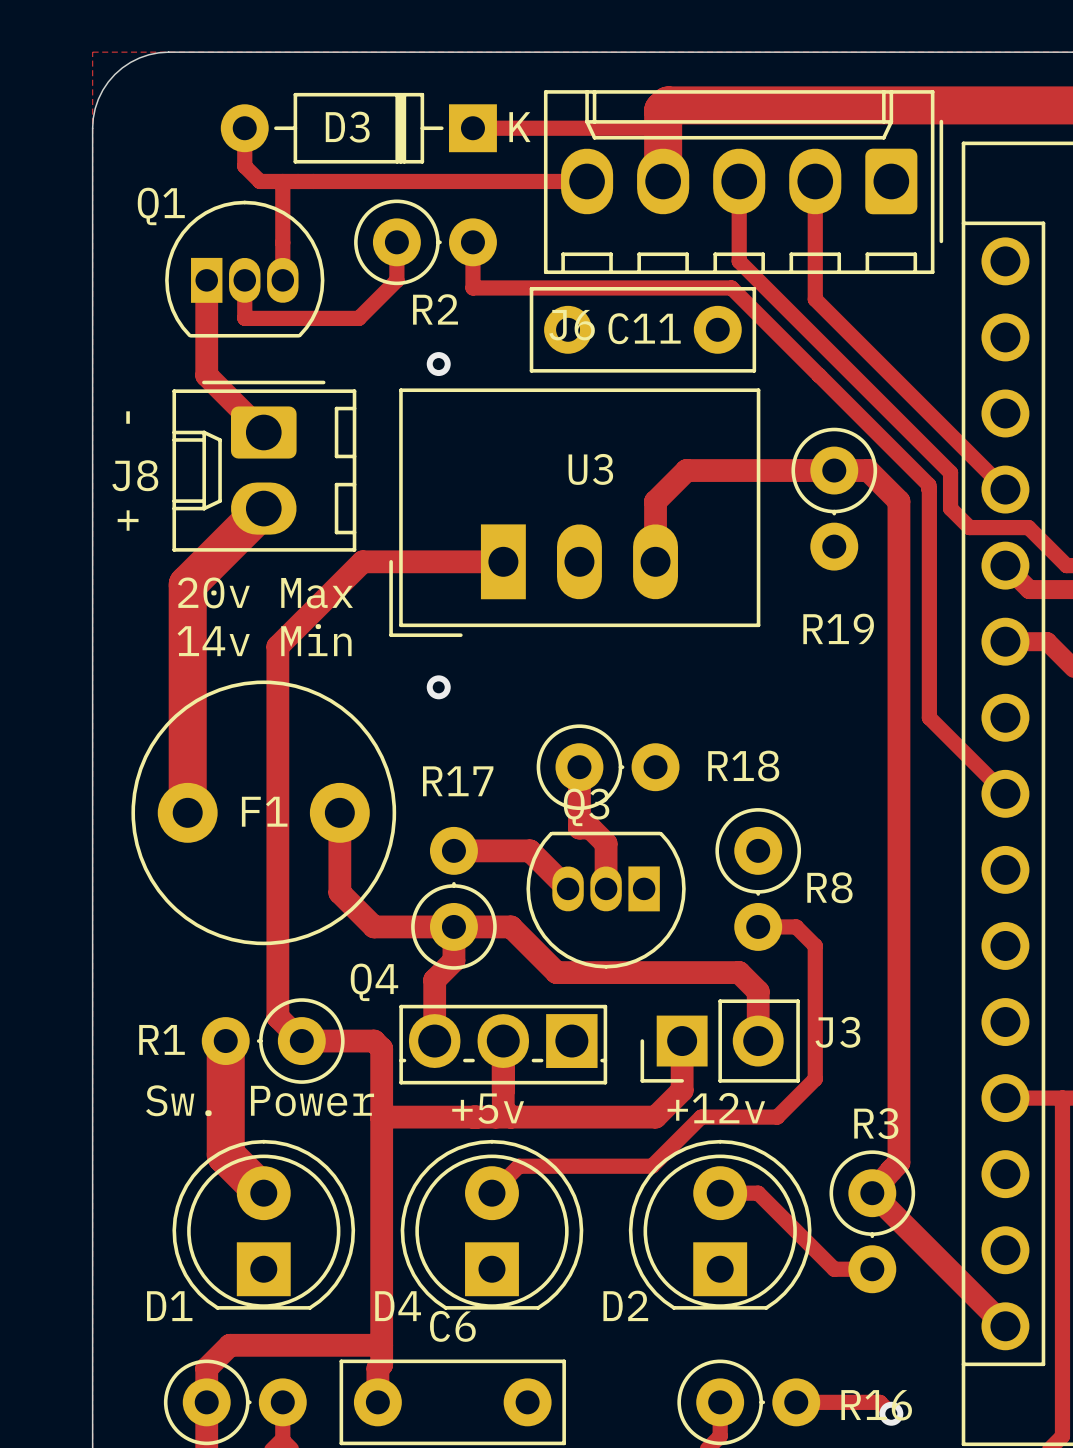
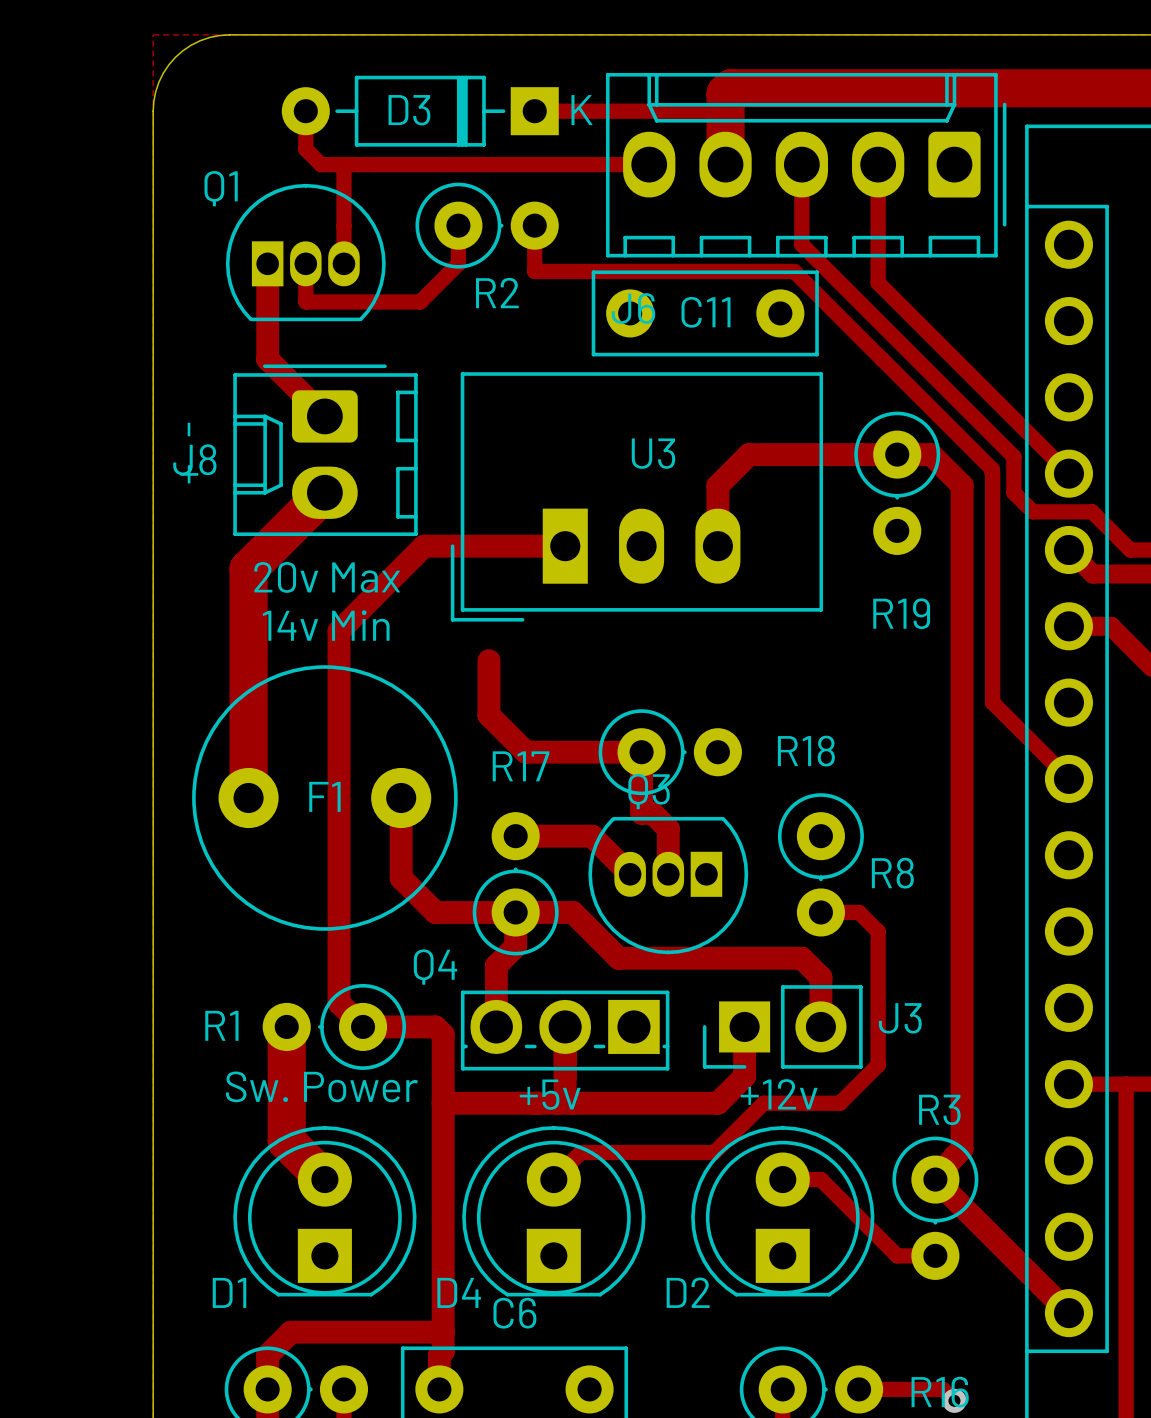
via: (438, 364) -> none
track: none -> (488, 660) (488, 715) (525, 752) (641, 752)
via: (438, 687) -> none

